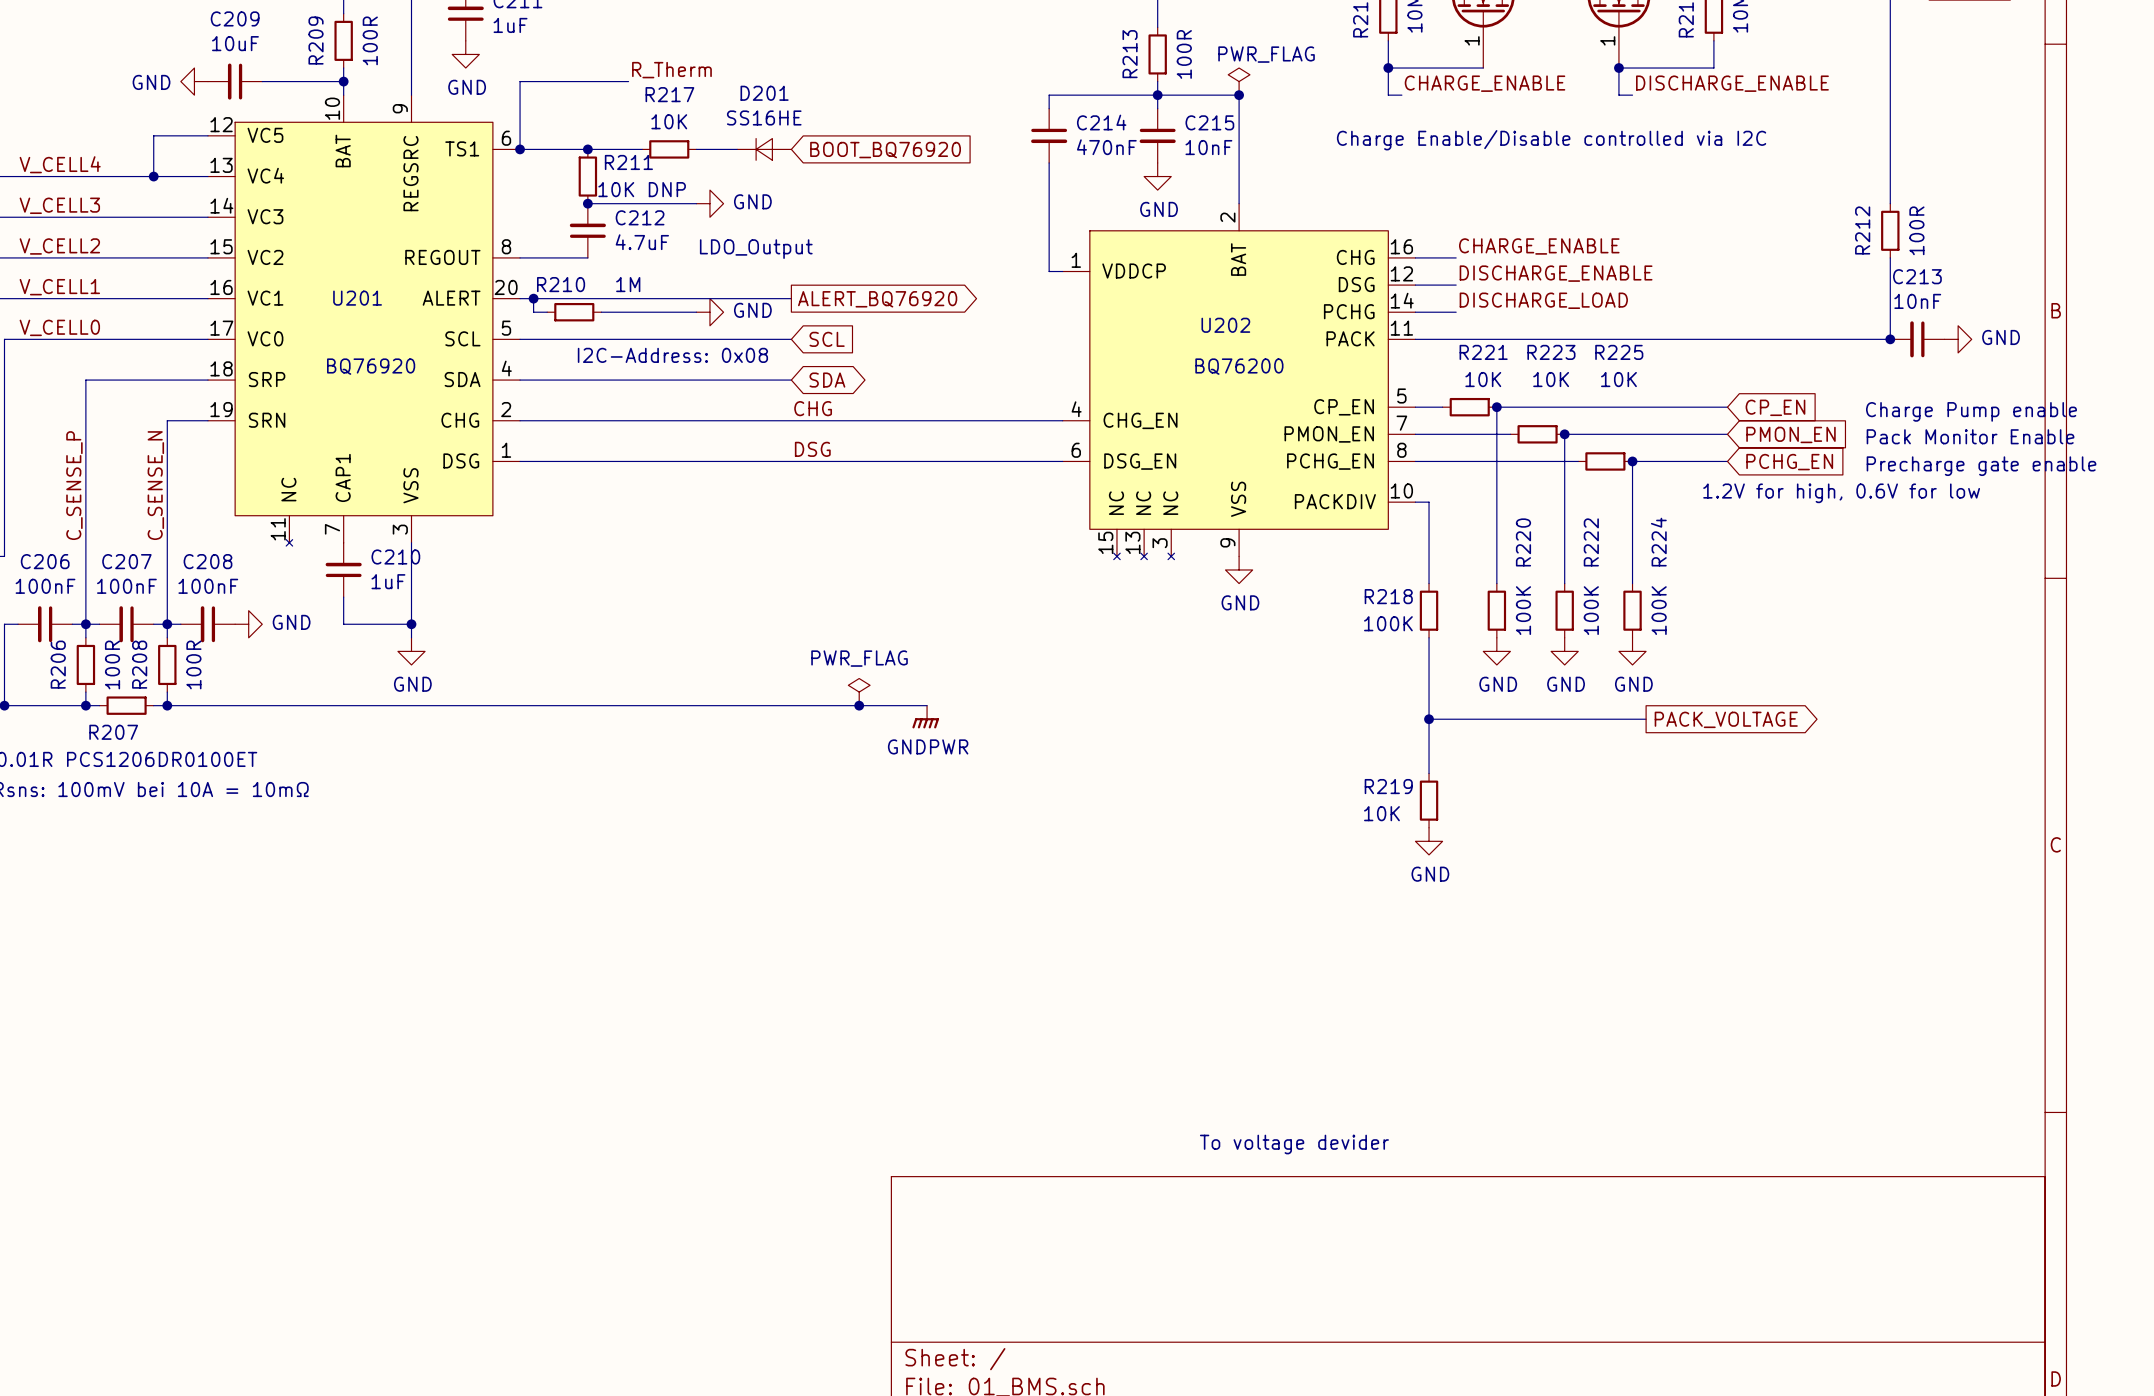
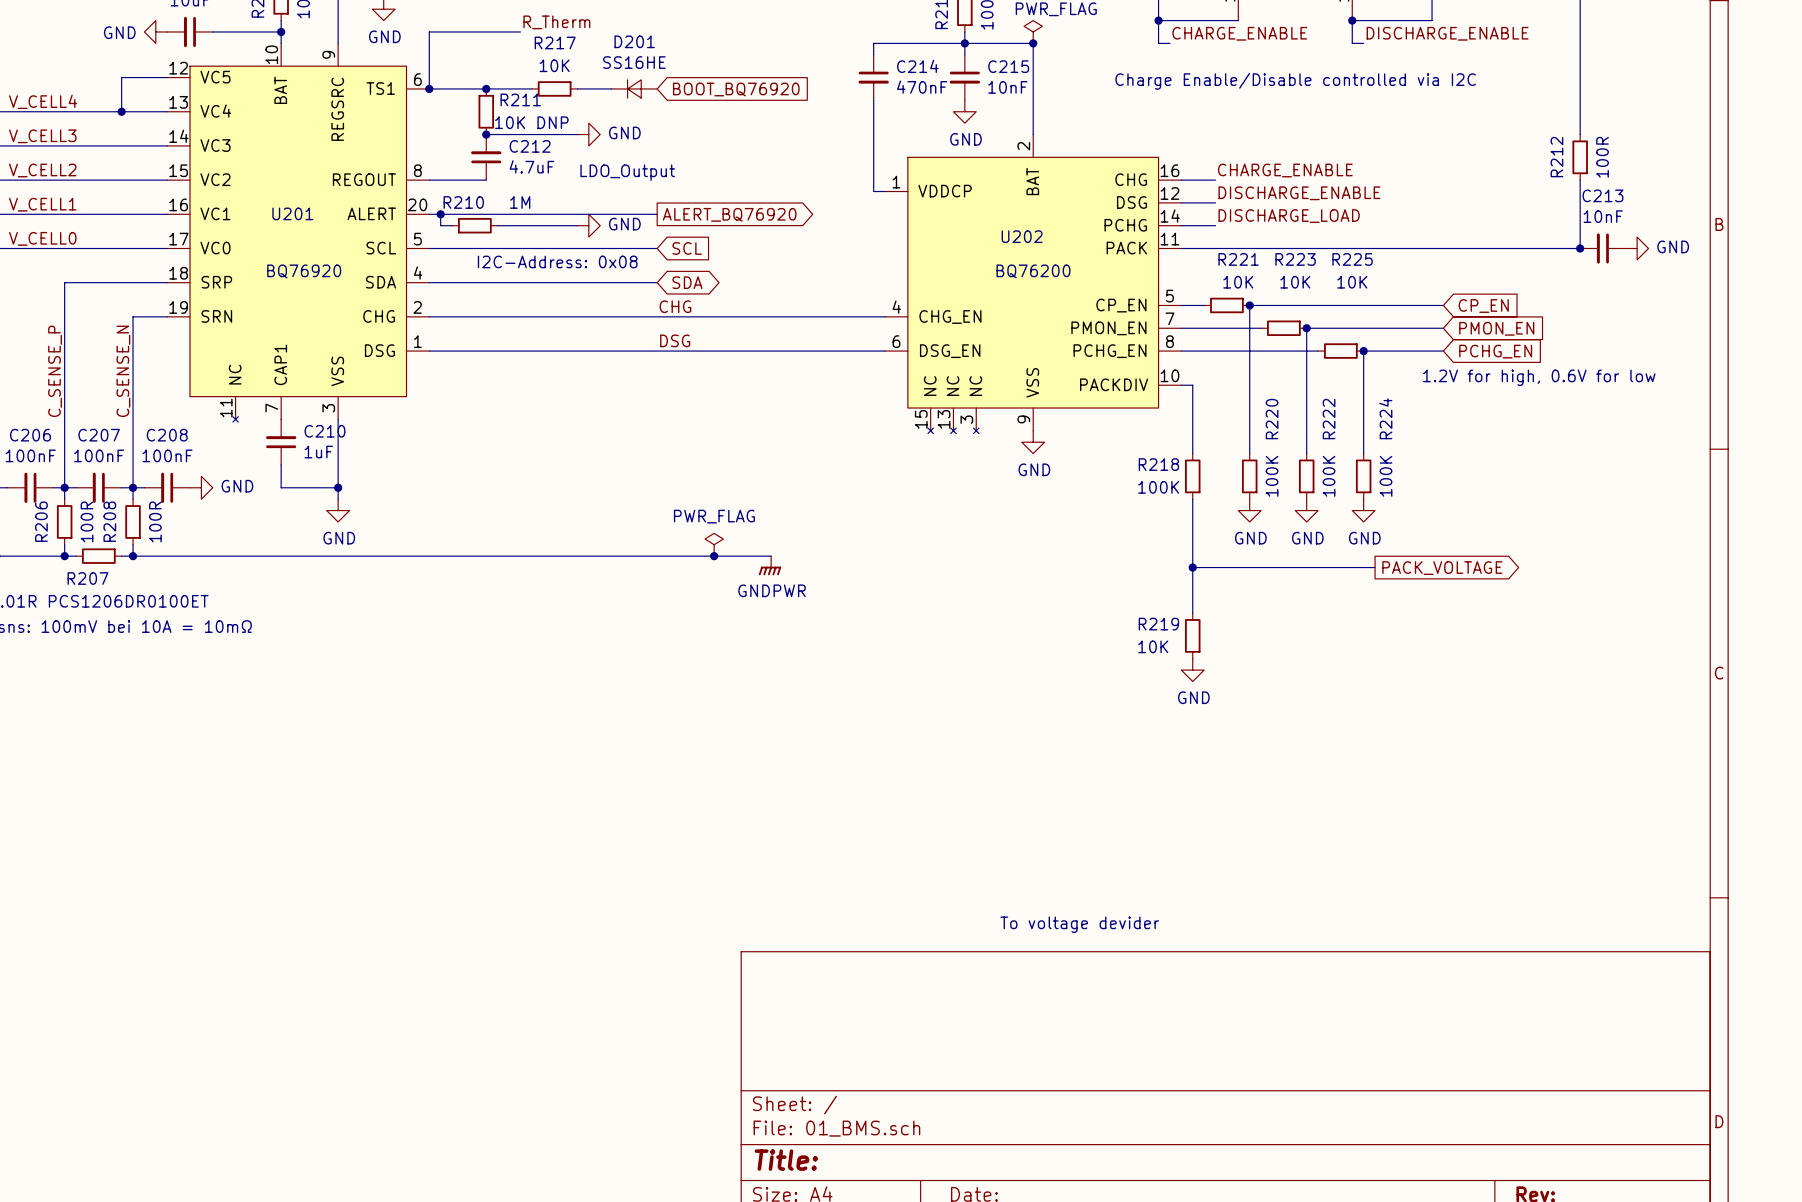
text: Charge Pump enable (1971, 411) -> none
text: Pack Monitor Enable (1970, 436) -> none
text: Precharge gate enable (1981, 466) -> none

